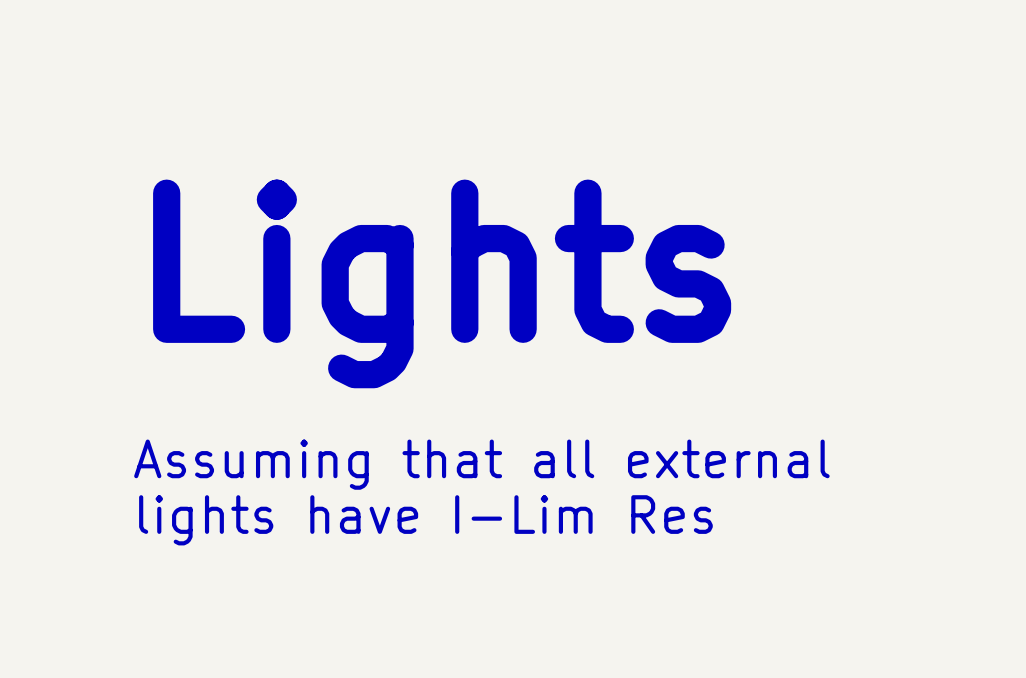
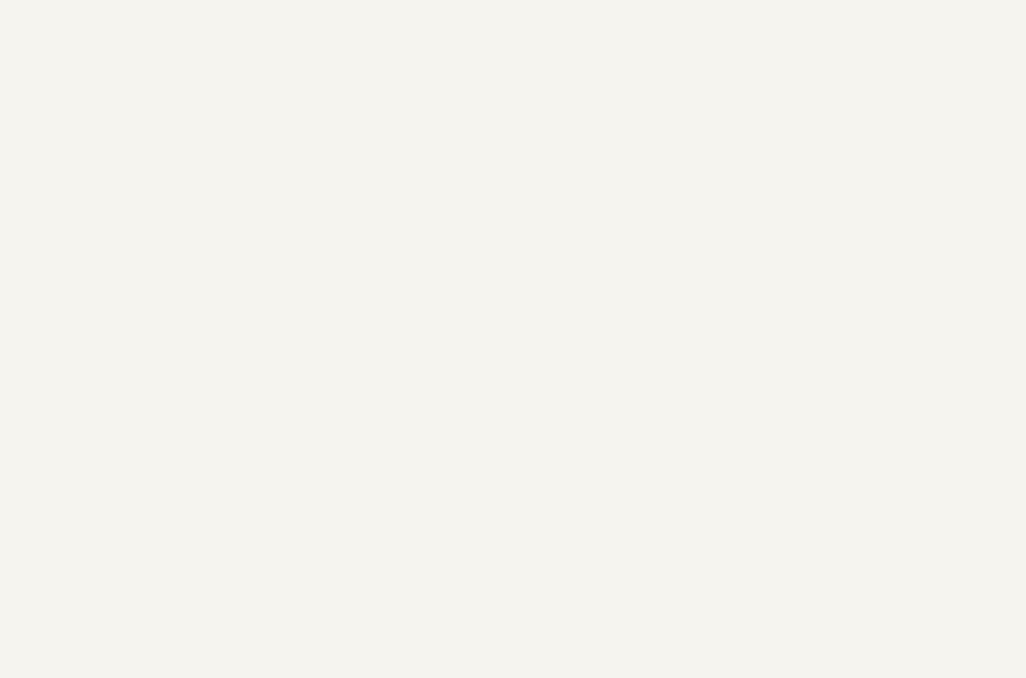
text: Lights (442, 283) -> none
text: Assuming that all external (481, 464) -> none
text: lights have I-Lim Res (425, 520) -> none

